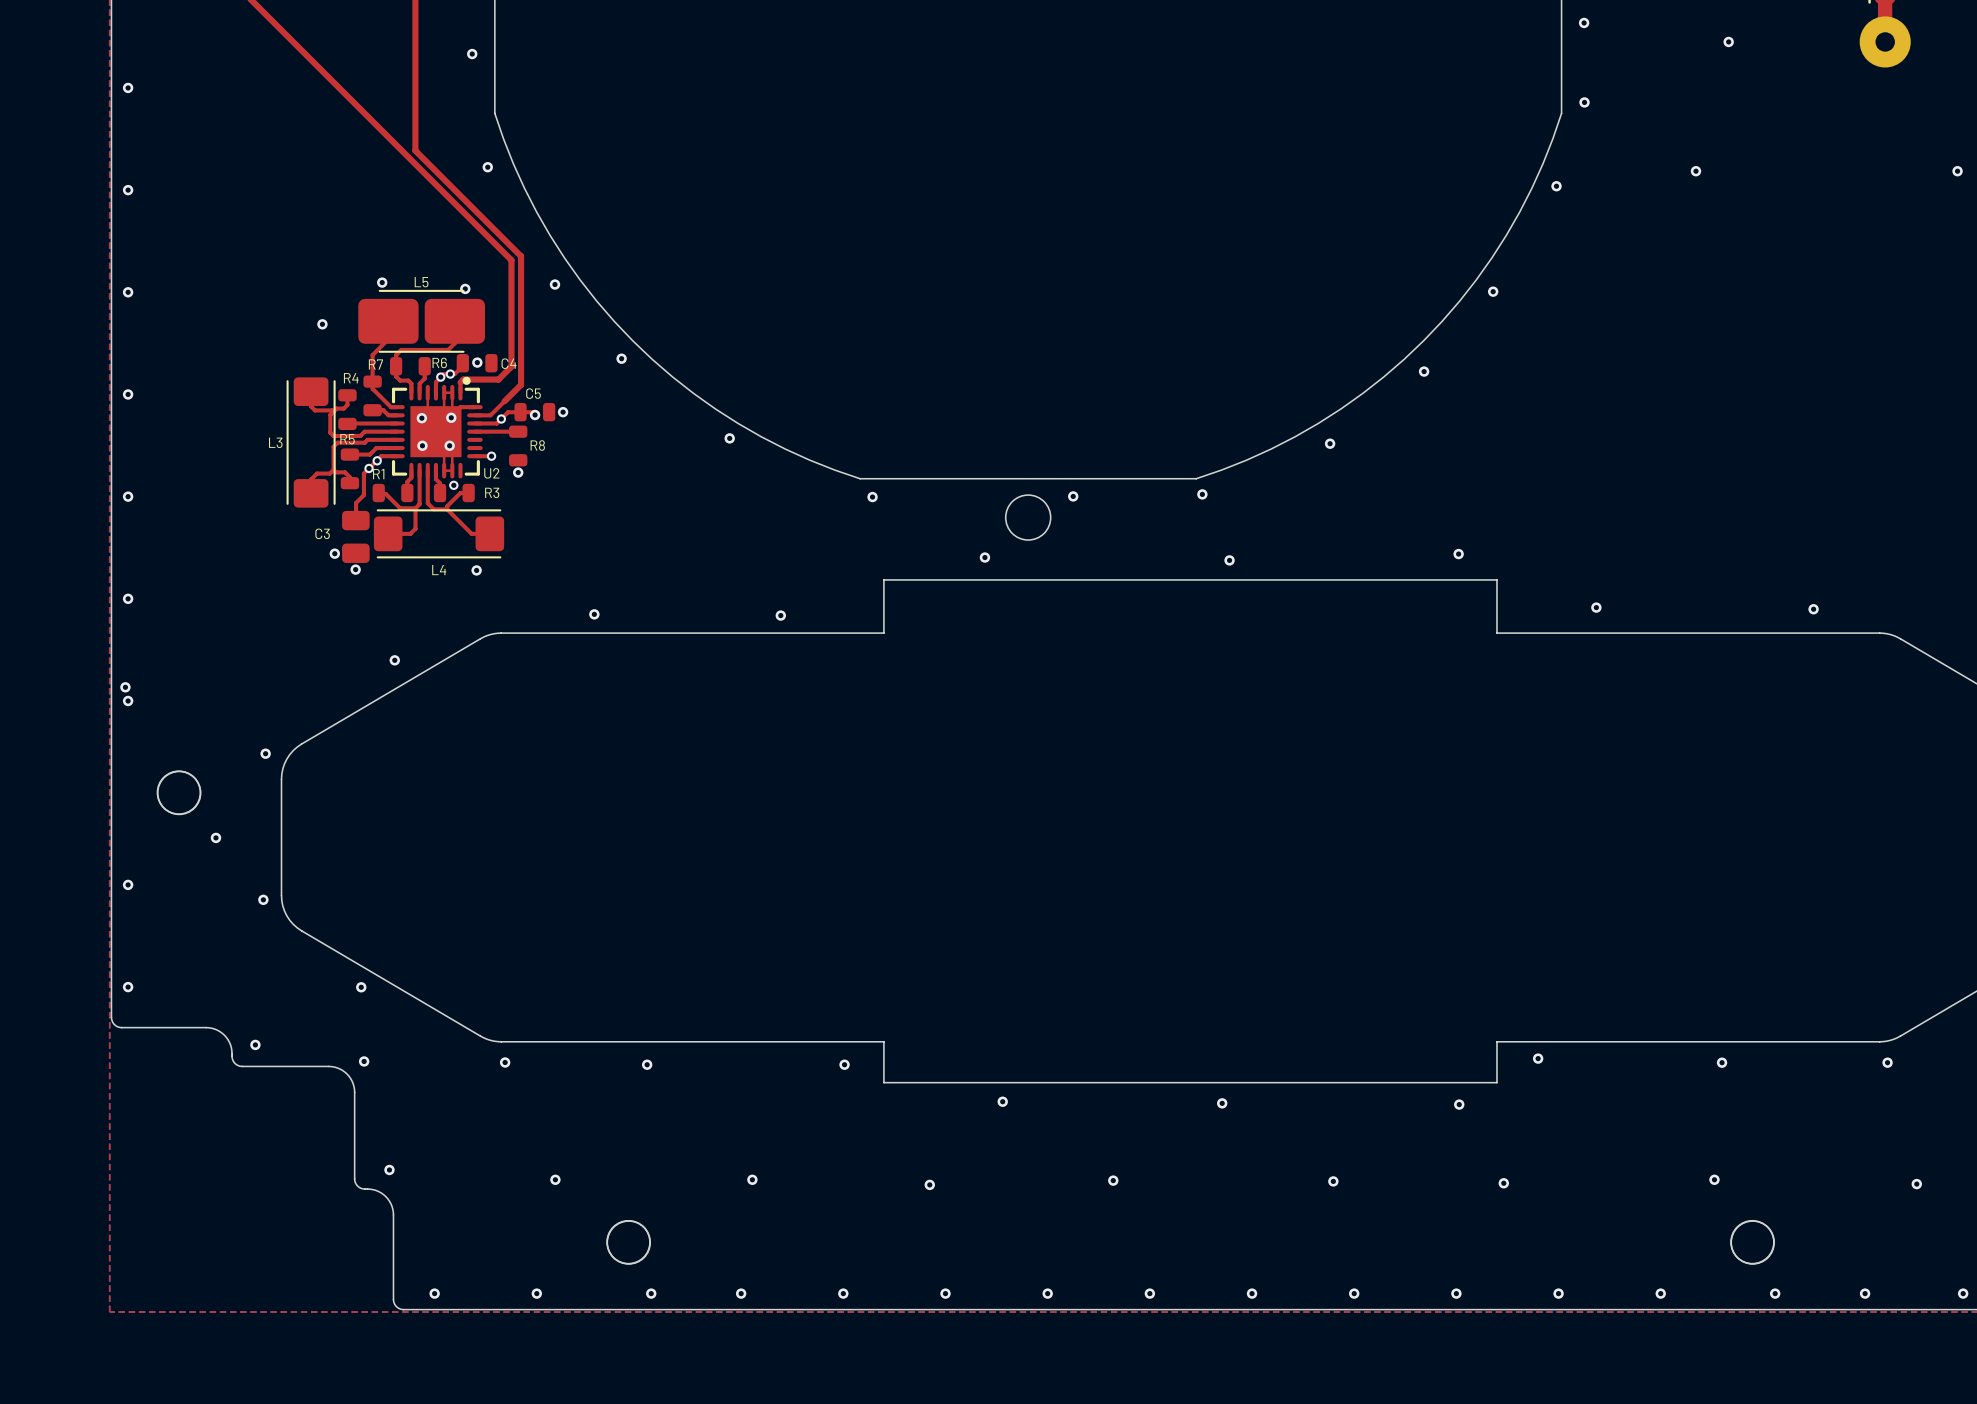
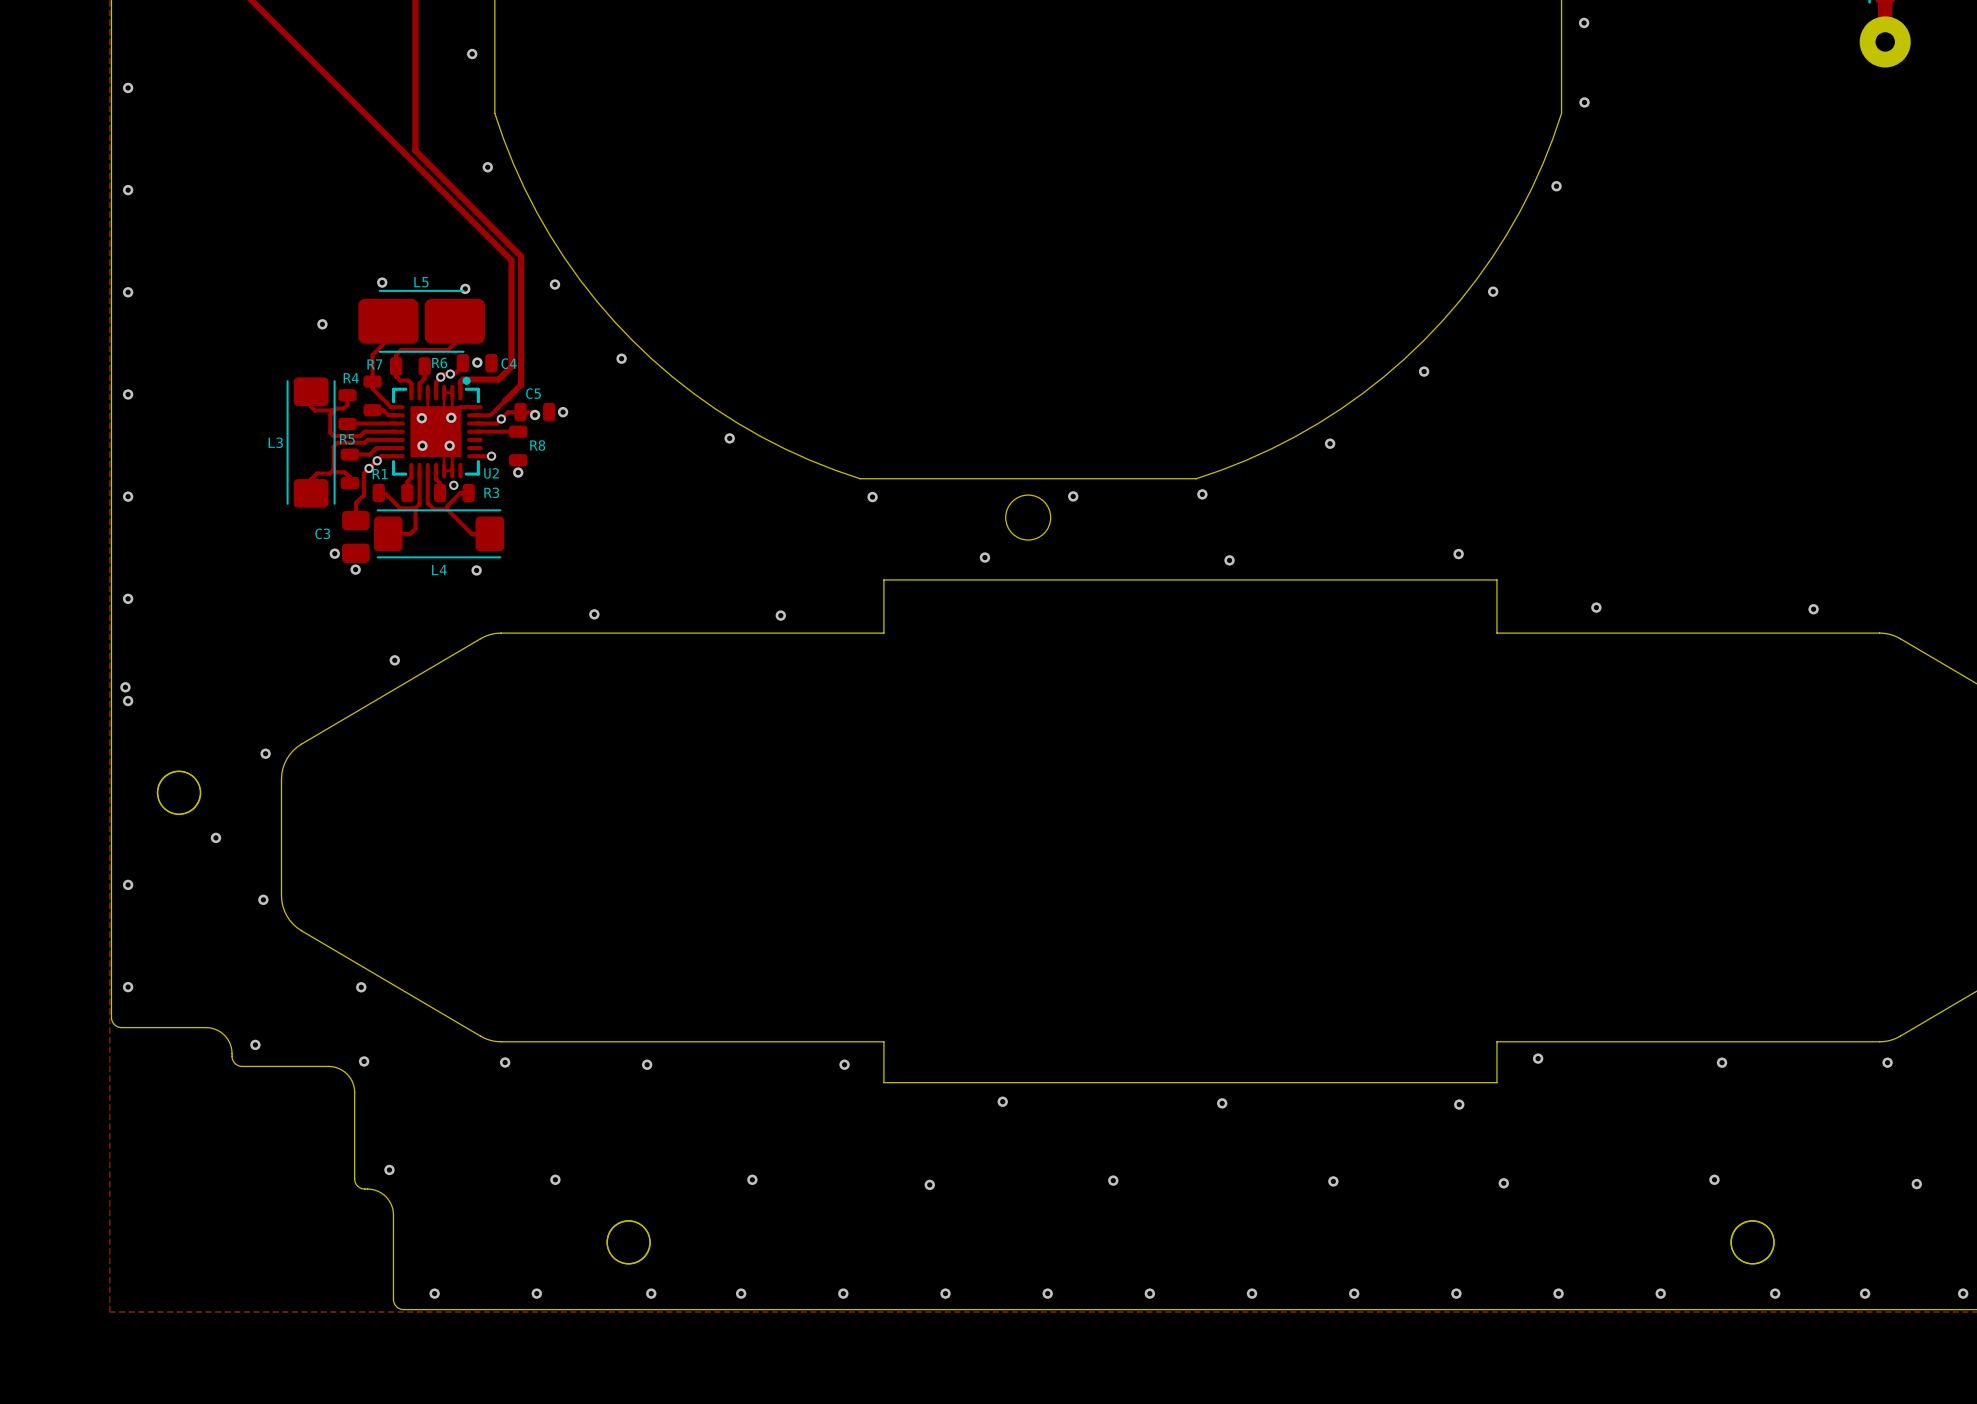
via: (1728, 41) -> none
via: (1695, 171) -> none
via: (1957, 171) -> none

